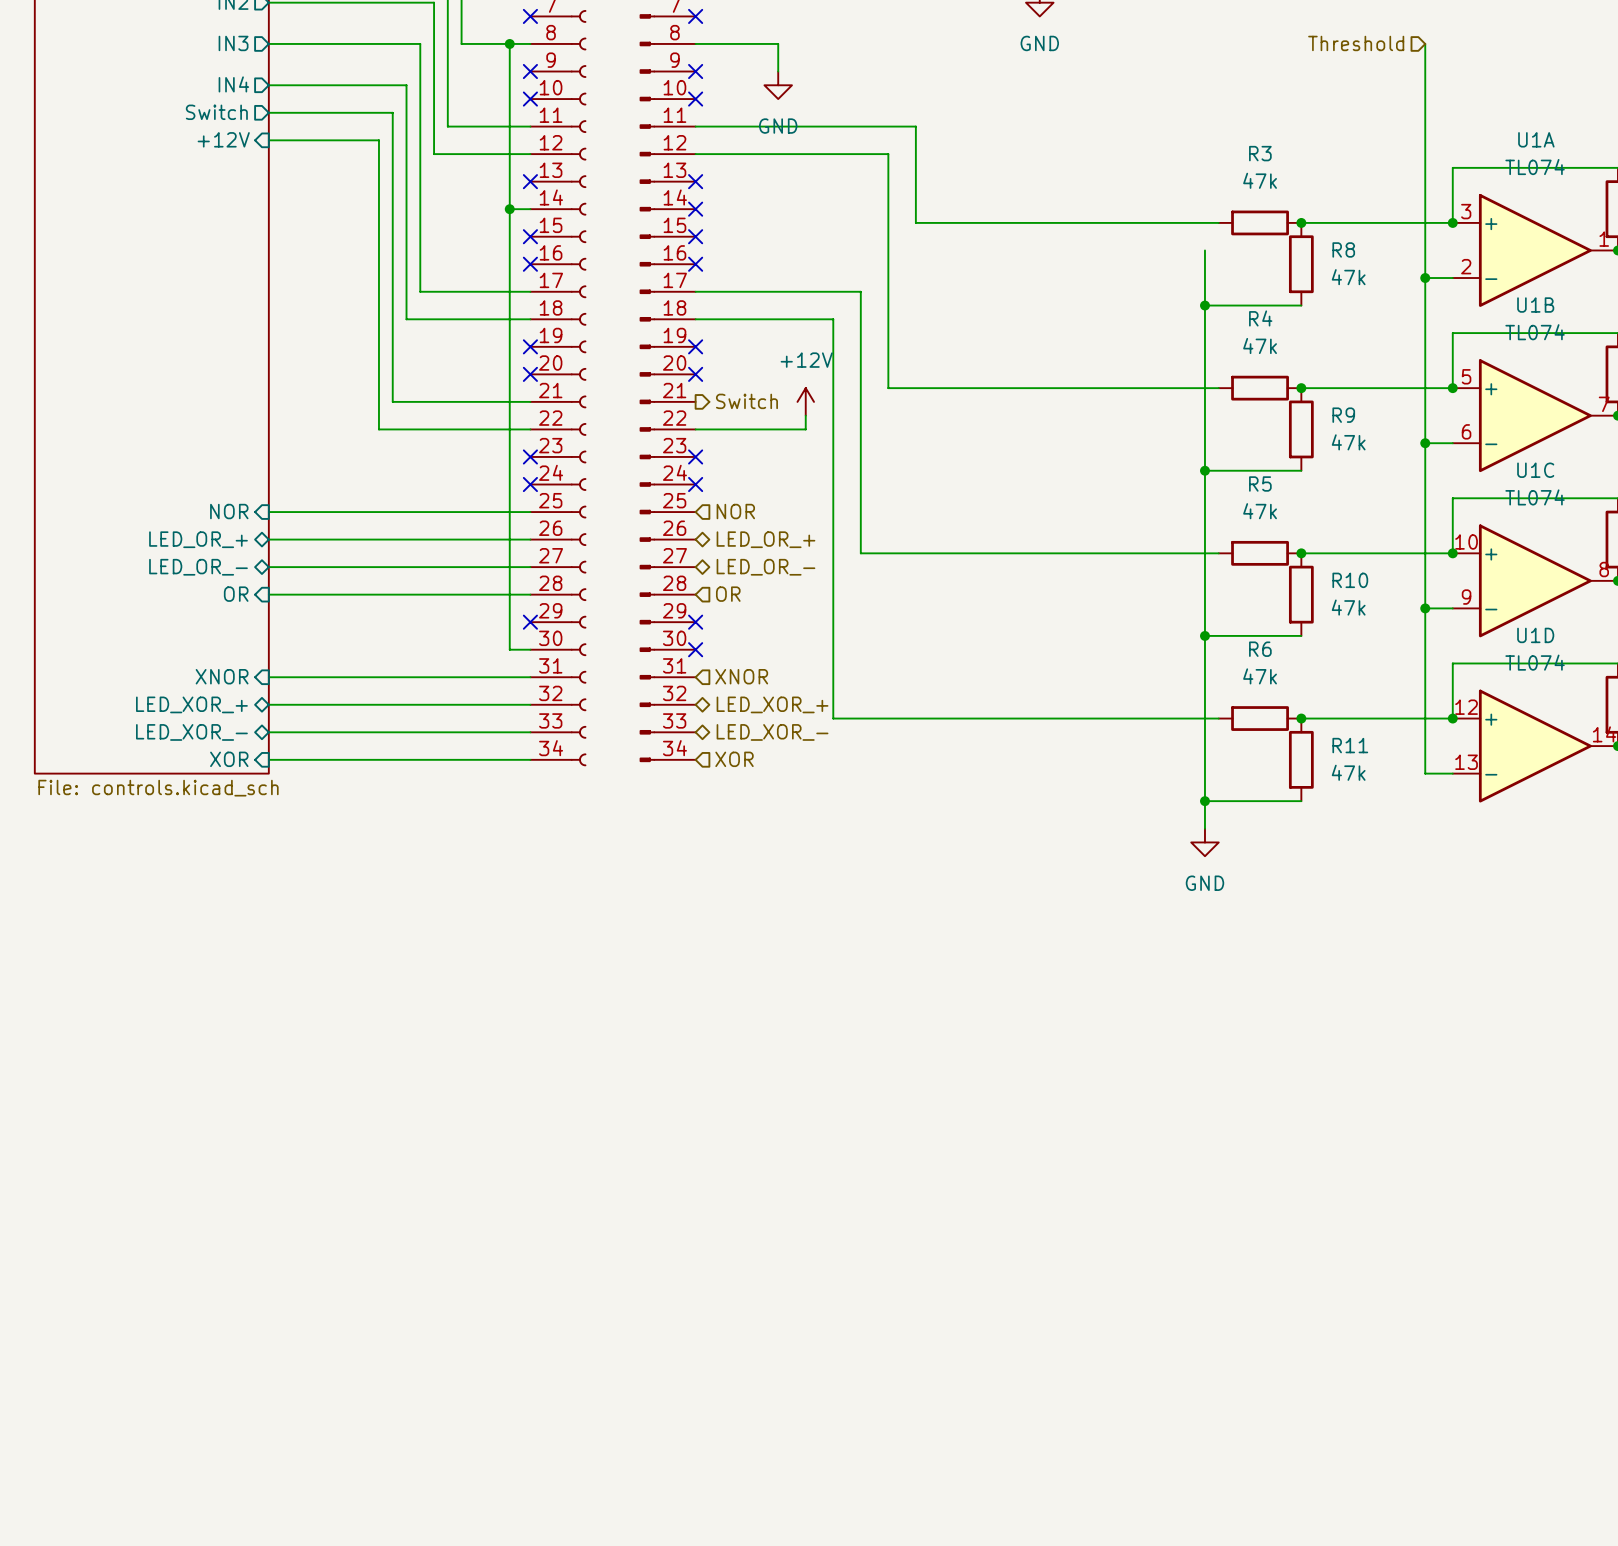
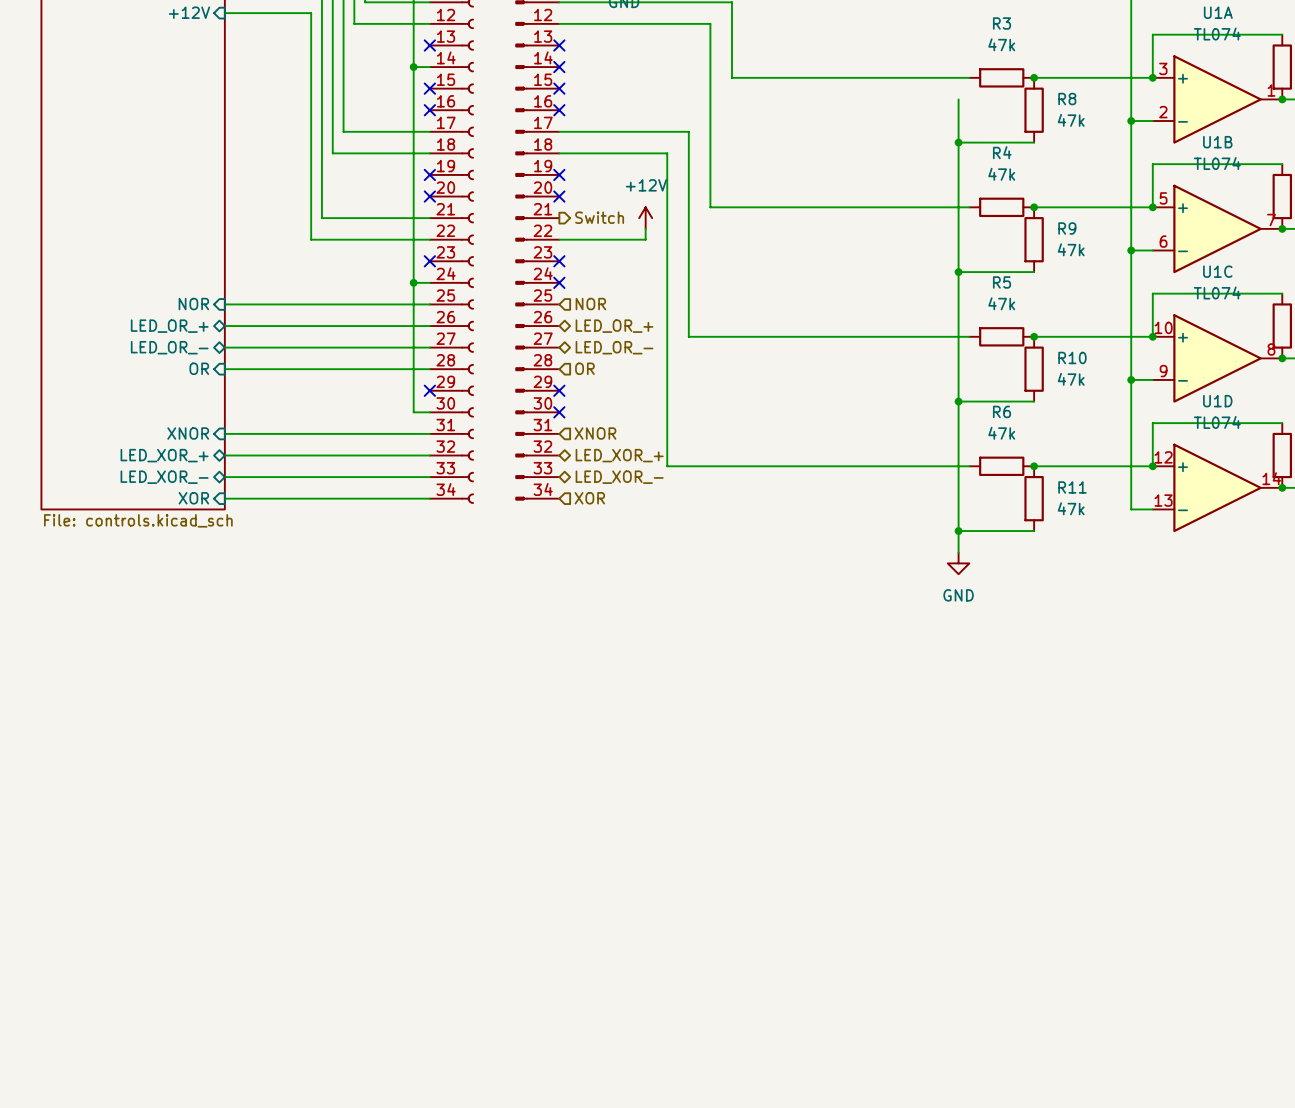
wire: none -> (413, 282) (429, 282)
junction: none -> (413, 282)
no-connect mark: (530, 484) -> none

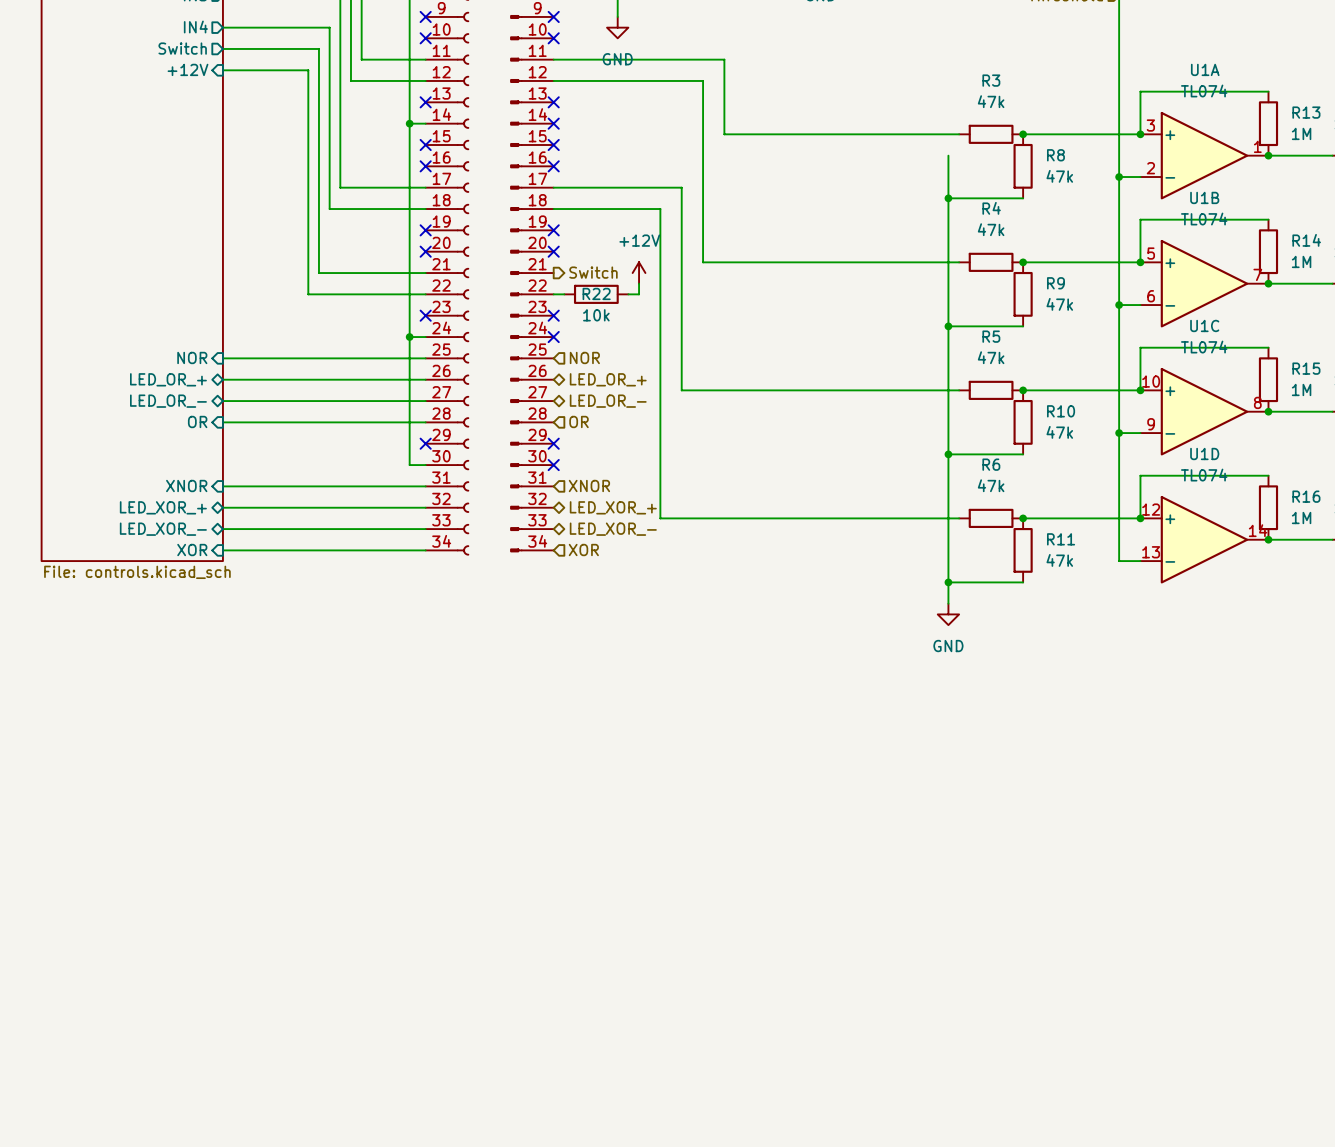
R22: none -> 10k (596, 294)

